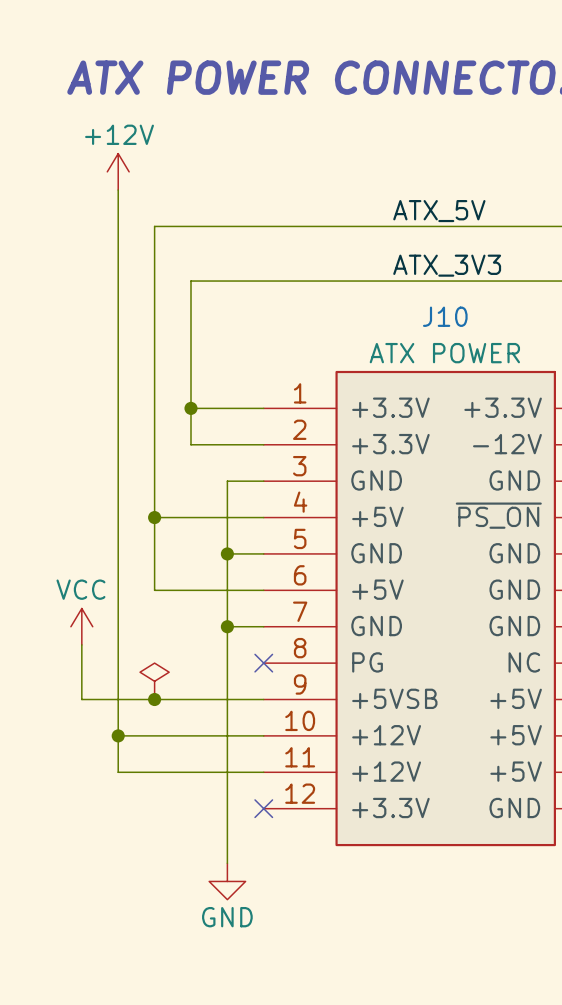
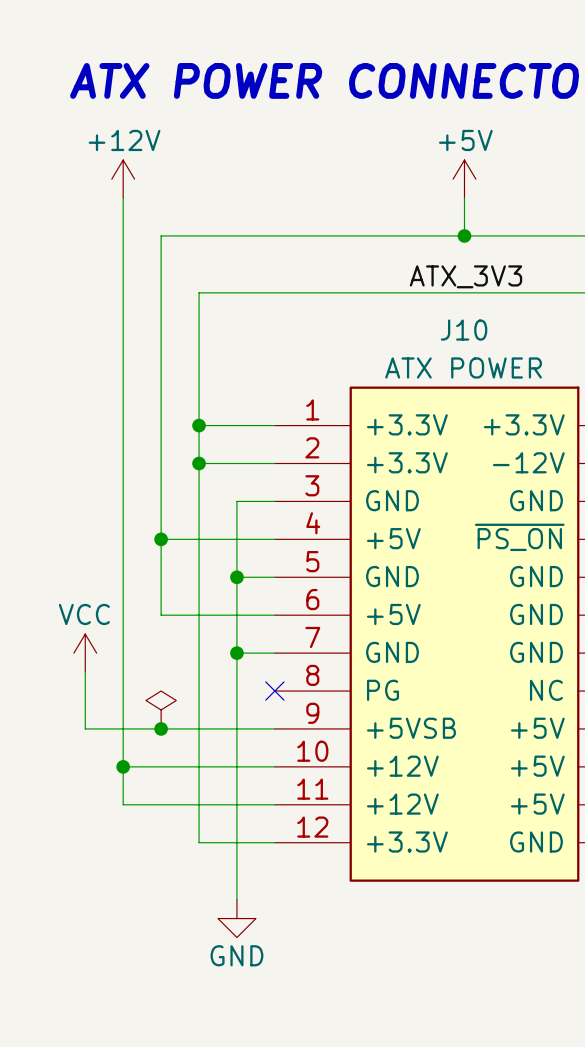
power symbol: none -> +5V (464, 179)
wire: none -> (464, 198) (464, 235)
label: ATX_5V (439, 211) -> none
junction: none -> (464, 235)
wire: none -> (199, 463) (199, 842) (274, 842)
junction: none -> (199, 463)
no-connect mark: (263, 808) -> none

